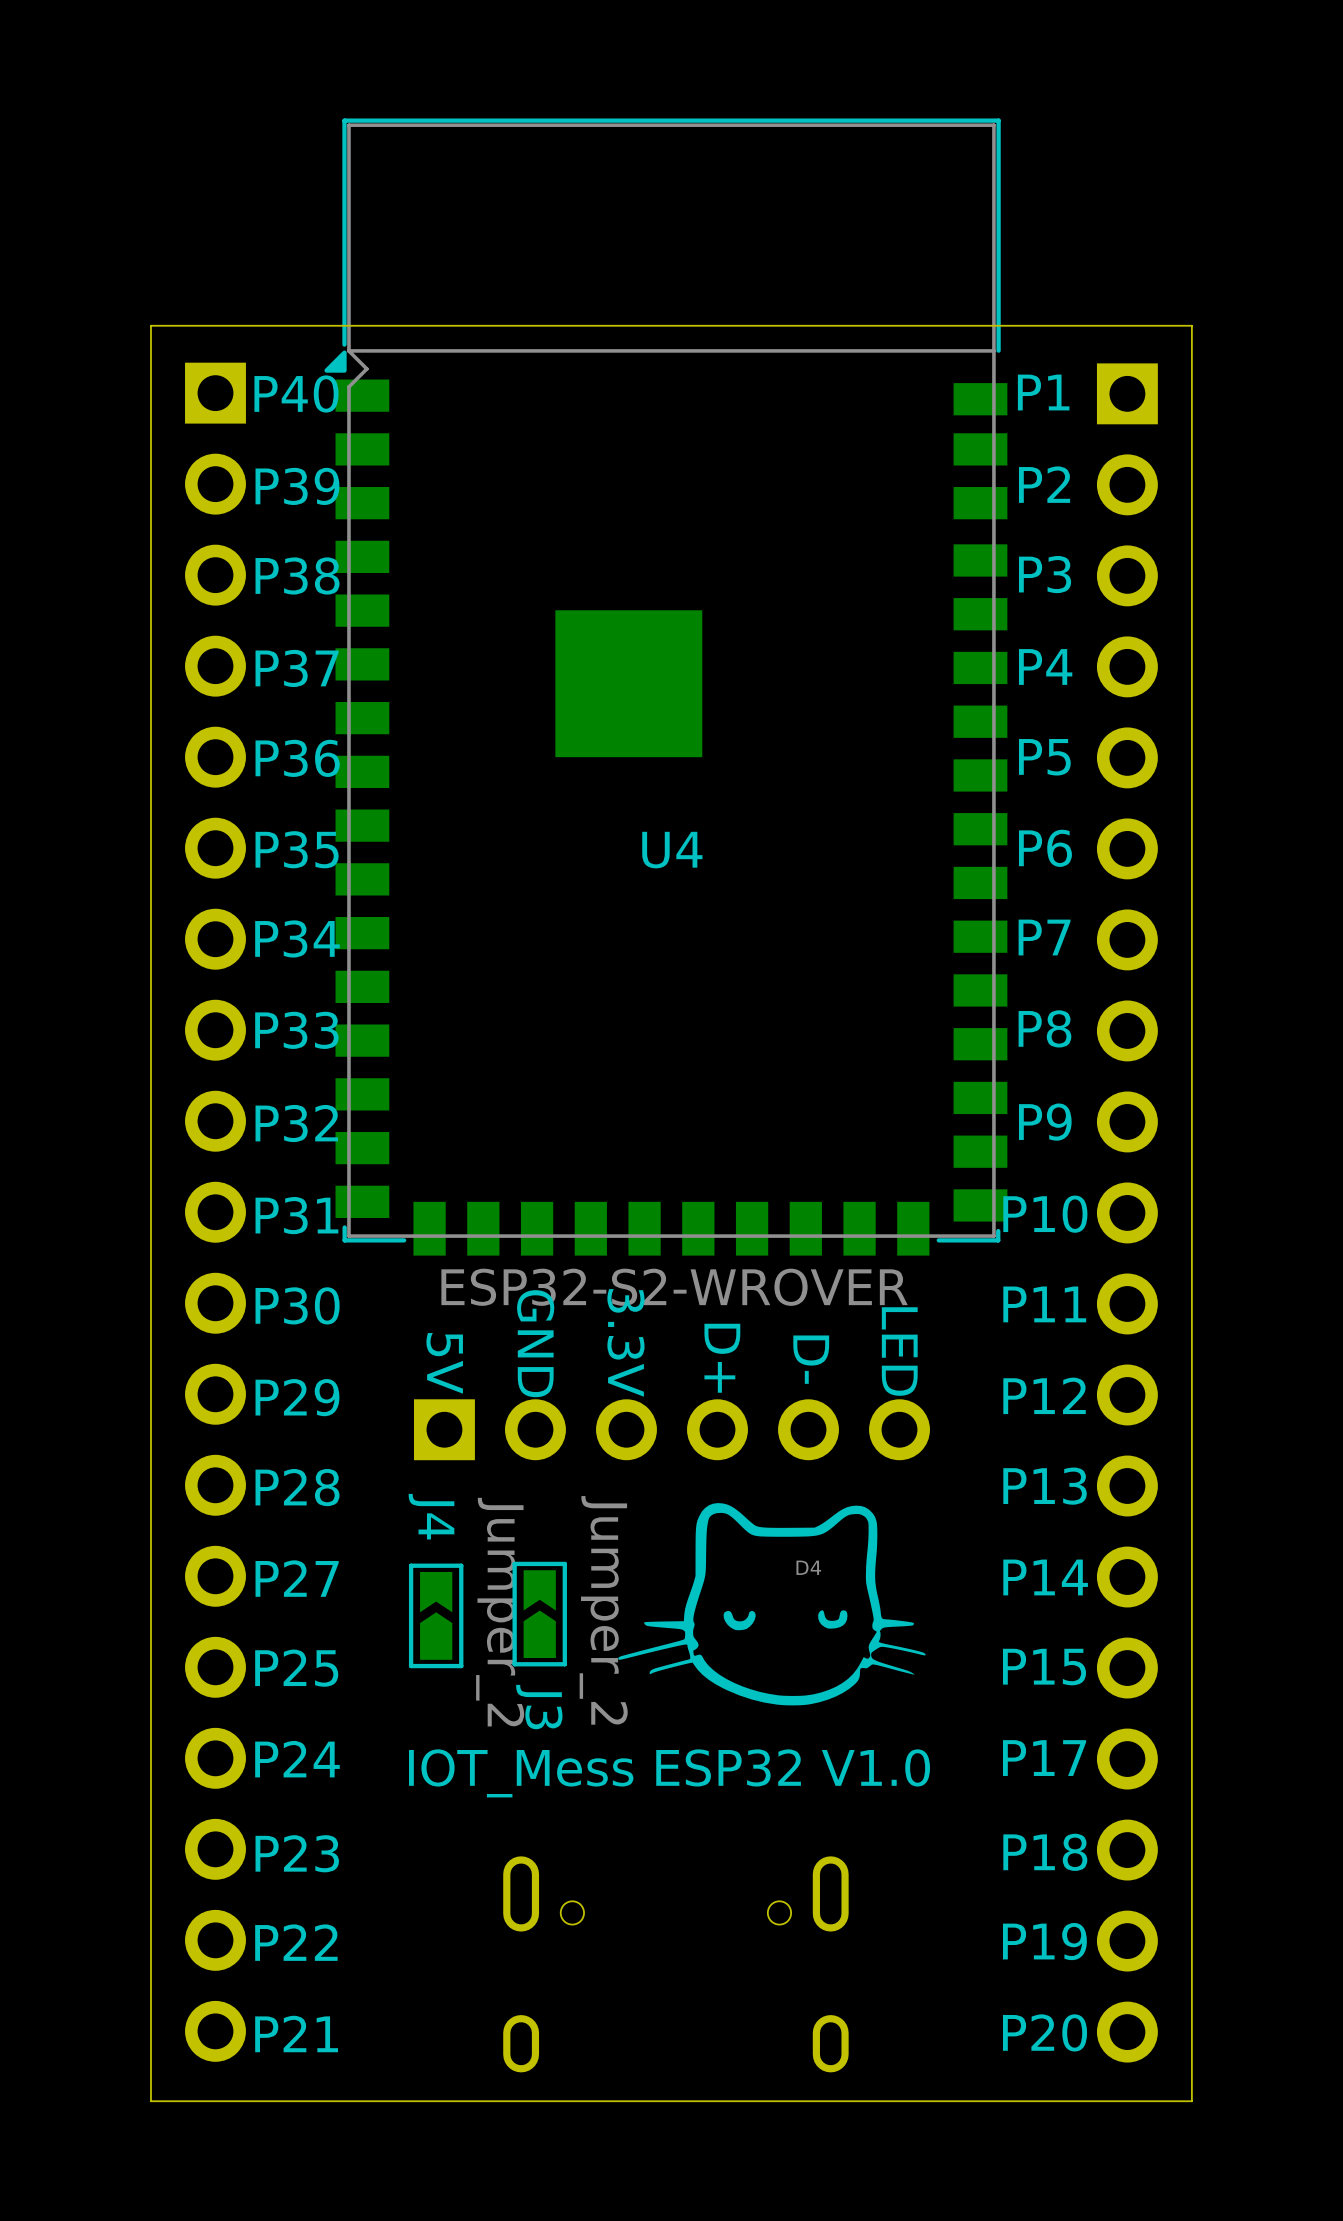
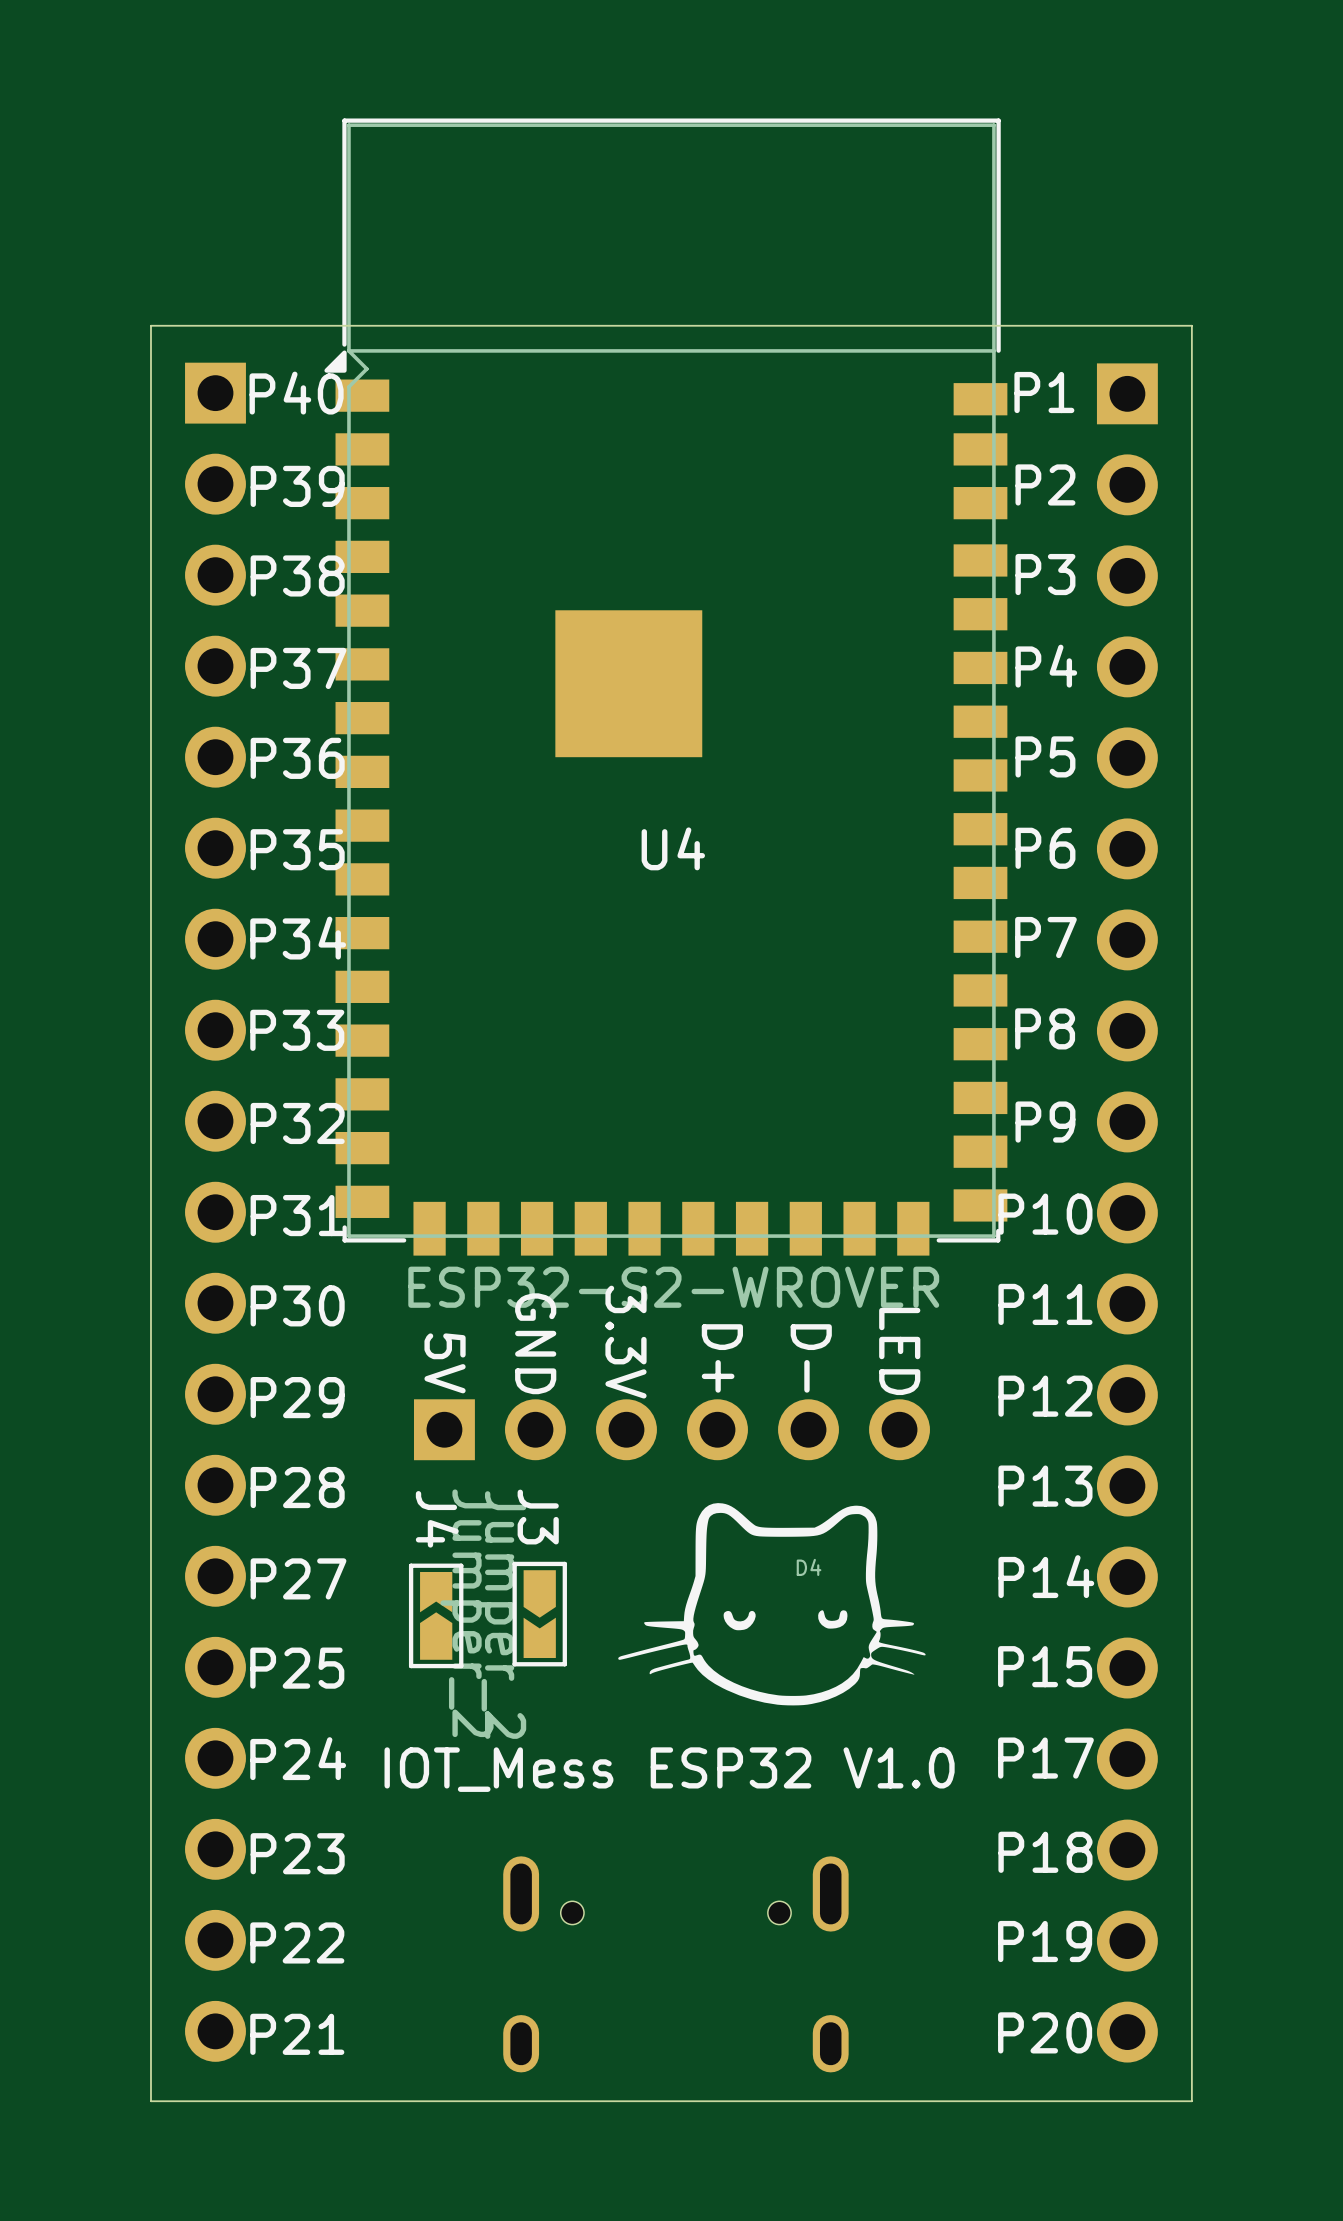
J3 rotation: 0° (539, 1614) -> 180° (539, 1614)

